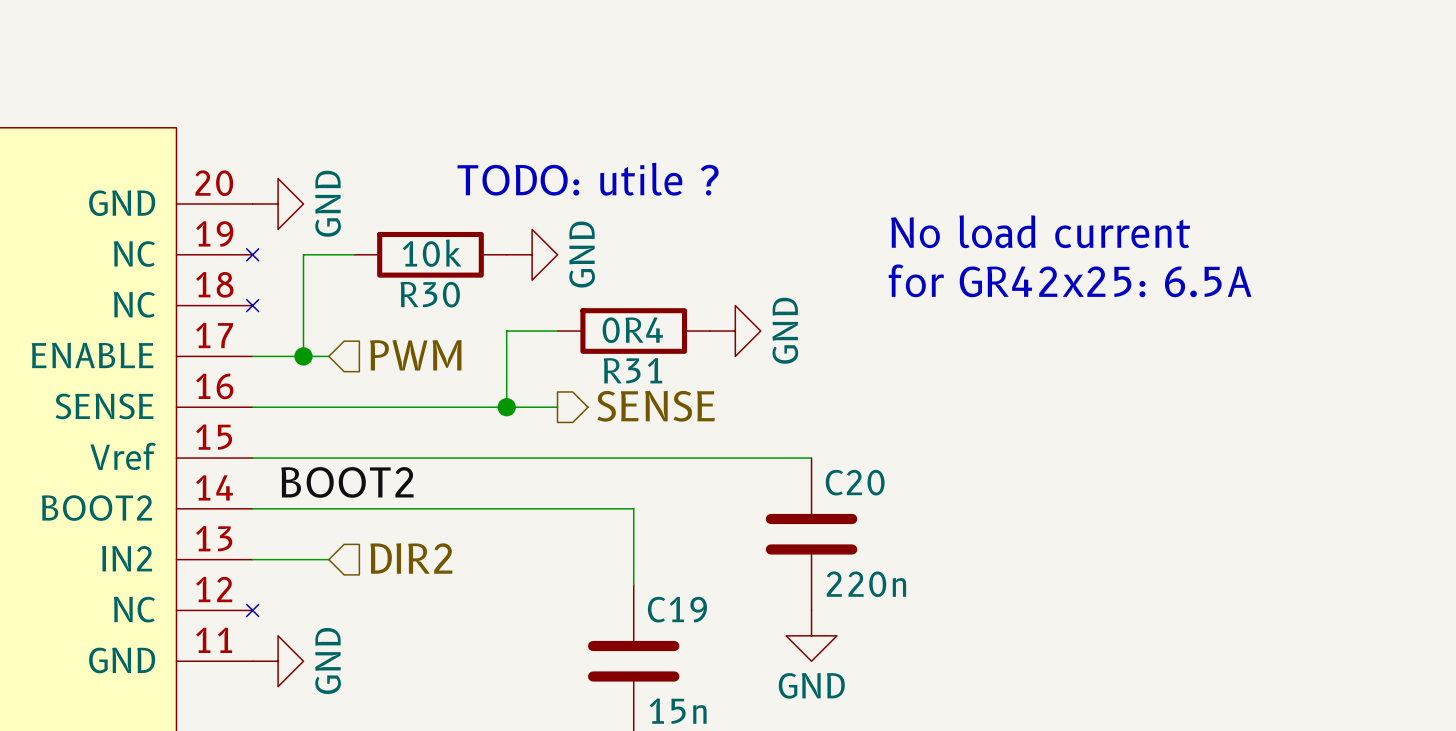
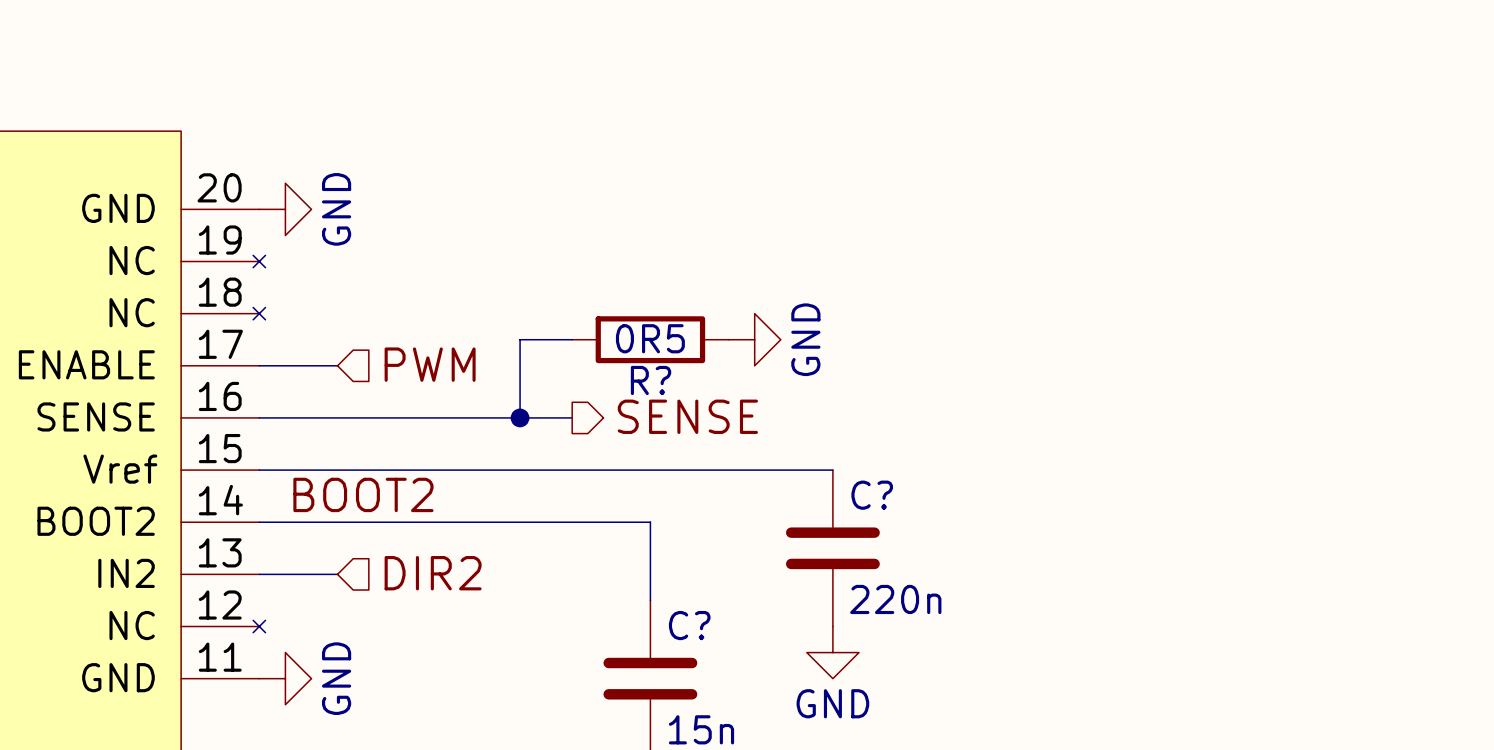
text: TODO: utile ? (588, 179) -> none
text: No load current (1040, 231) -> none
wire: (354, 254) (303, 254) (303, 356) -> none
R30: 10k (430, 254) -> none
power symbol: GND (532, 254) -> none
text: for GR42x25: 6.5A (1070, 280) -> none
R31 value: 0R4 (632, 330) -> 0R5 (650, 338)
junction: (303, 356) -> none
R31 name: R31 (632, 370) -> R? (651, 380)
C20 name: C20 (855, 482) -> C? (872, 495)
C19 name: C19 (677, 609) -> C? (689, 625)

